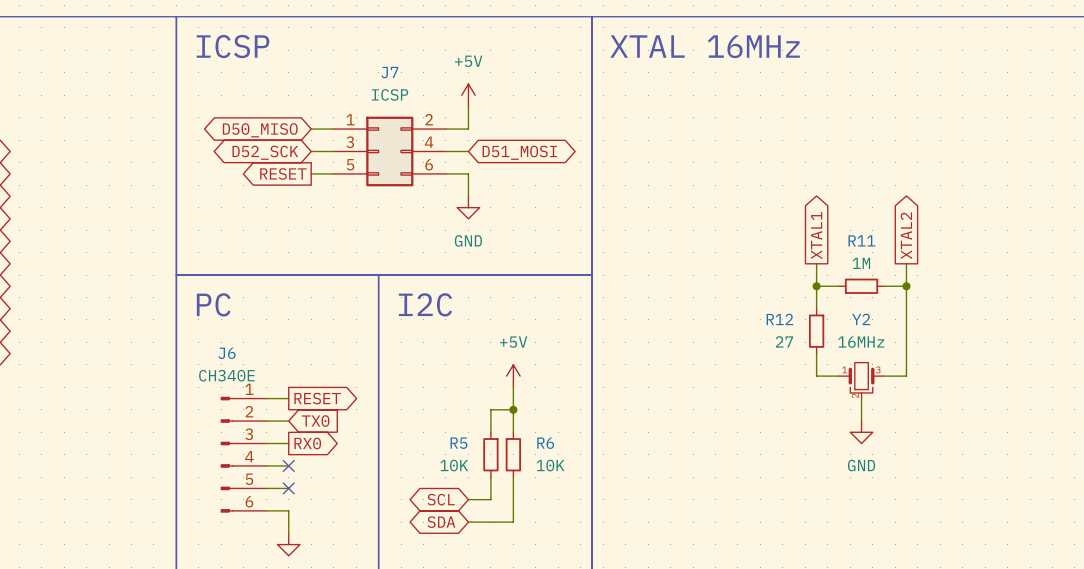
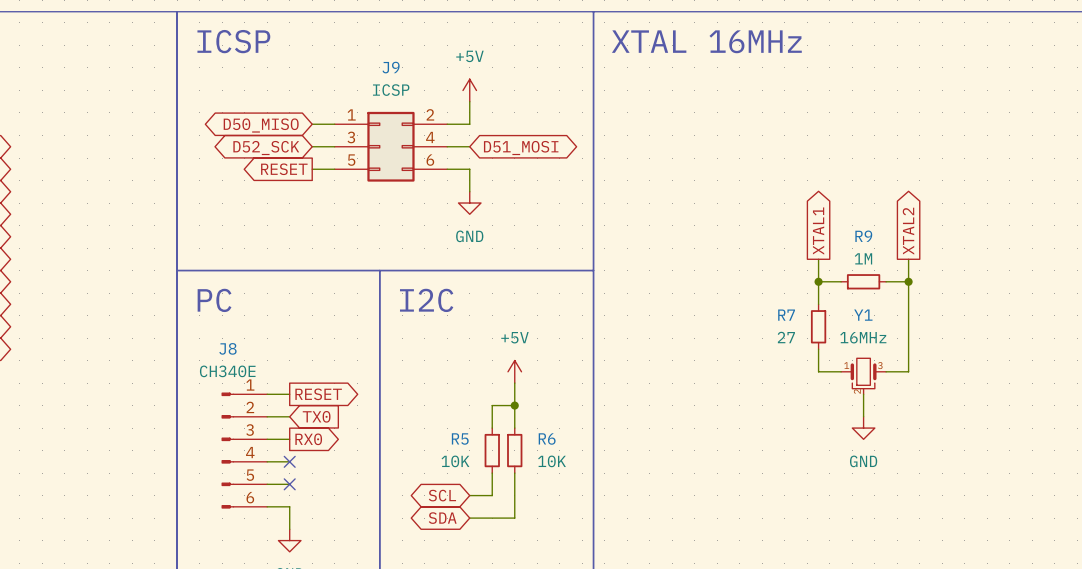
J7 name: J7 (389, 72) -> J9 (391, 67)
R11 name: R11 (861, 240) -> R9 (863, 236)
R12 name: R12 (779, 319) -> R7 (786, 315)
Y2 name: Y2 (861, 319) -> Y1 (863, 315)
J6 name: J6 (227, 353) -> J8 (227, 348)

